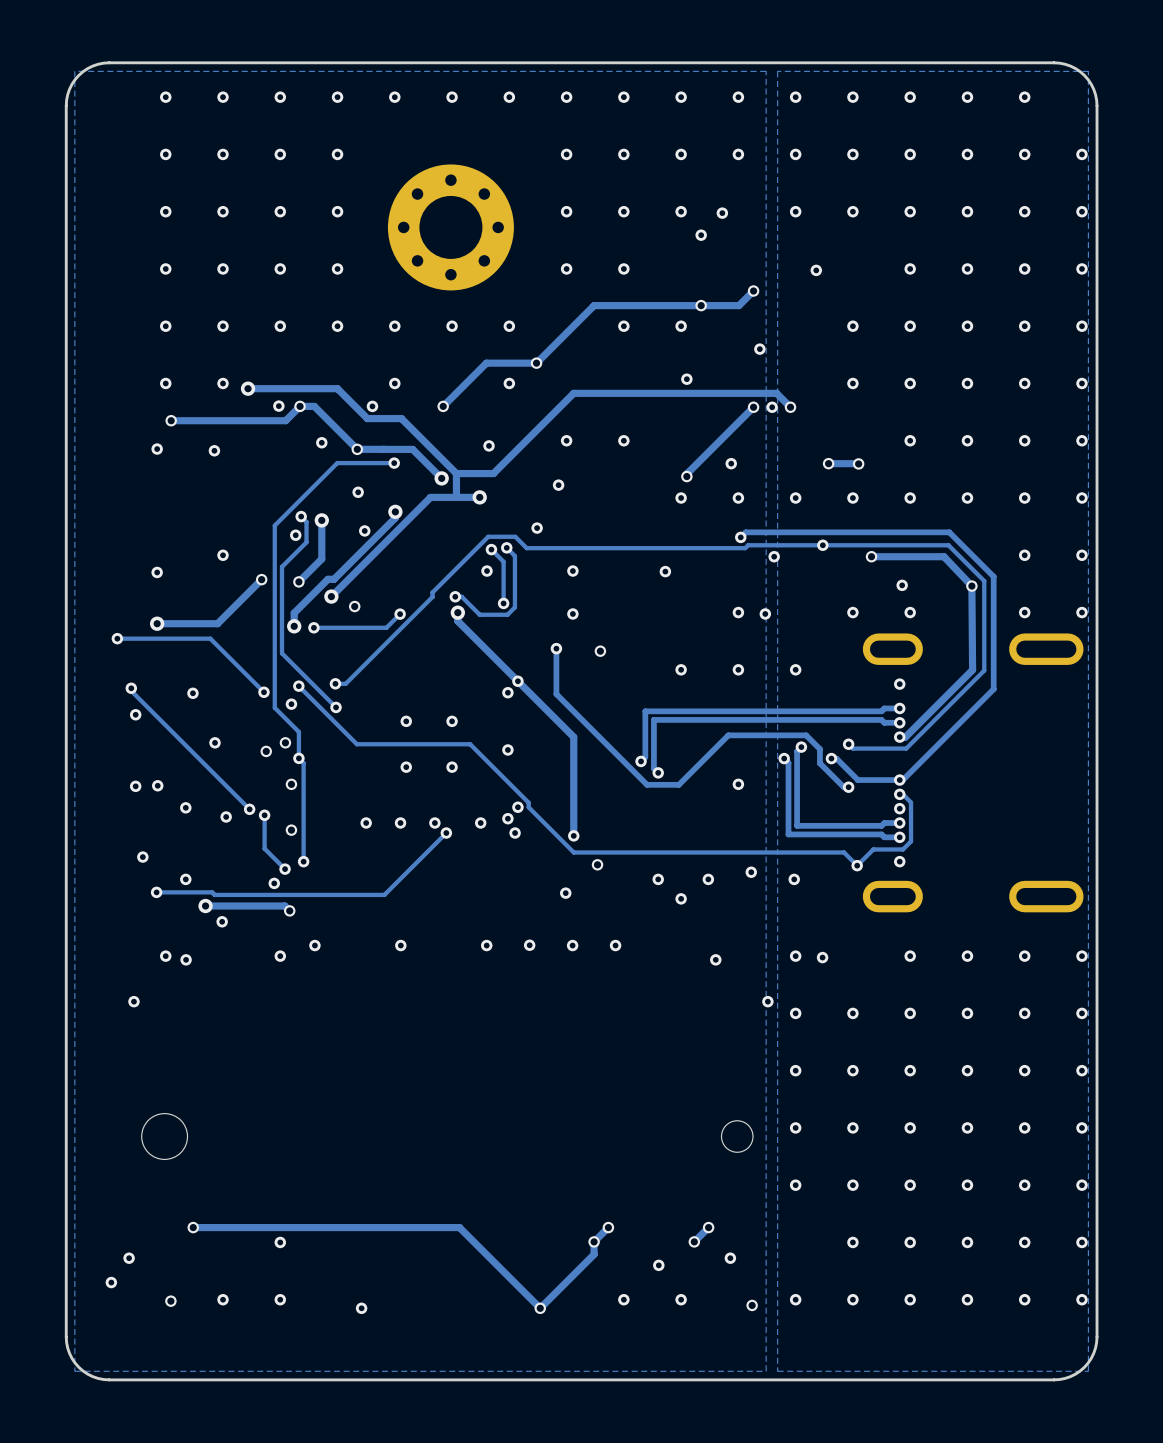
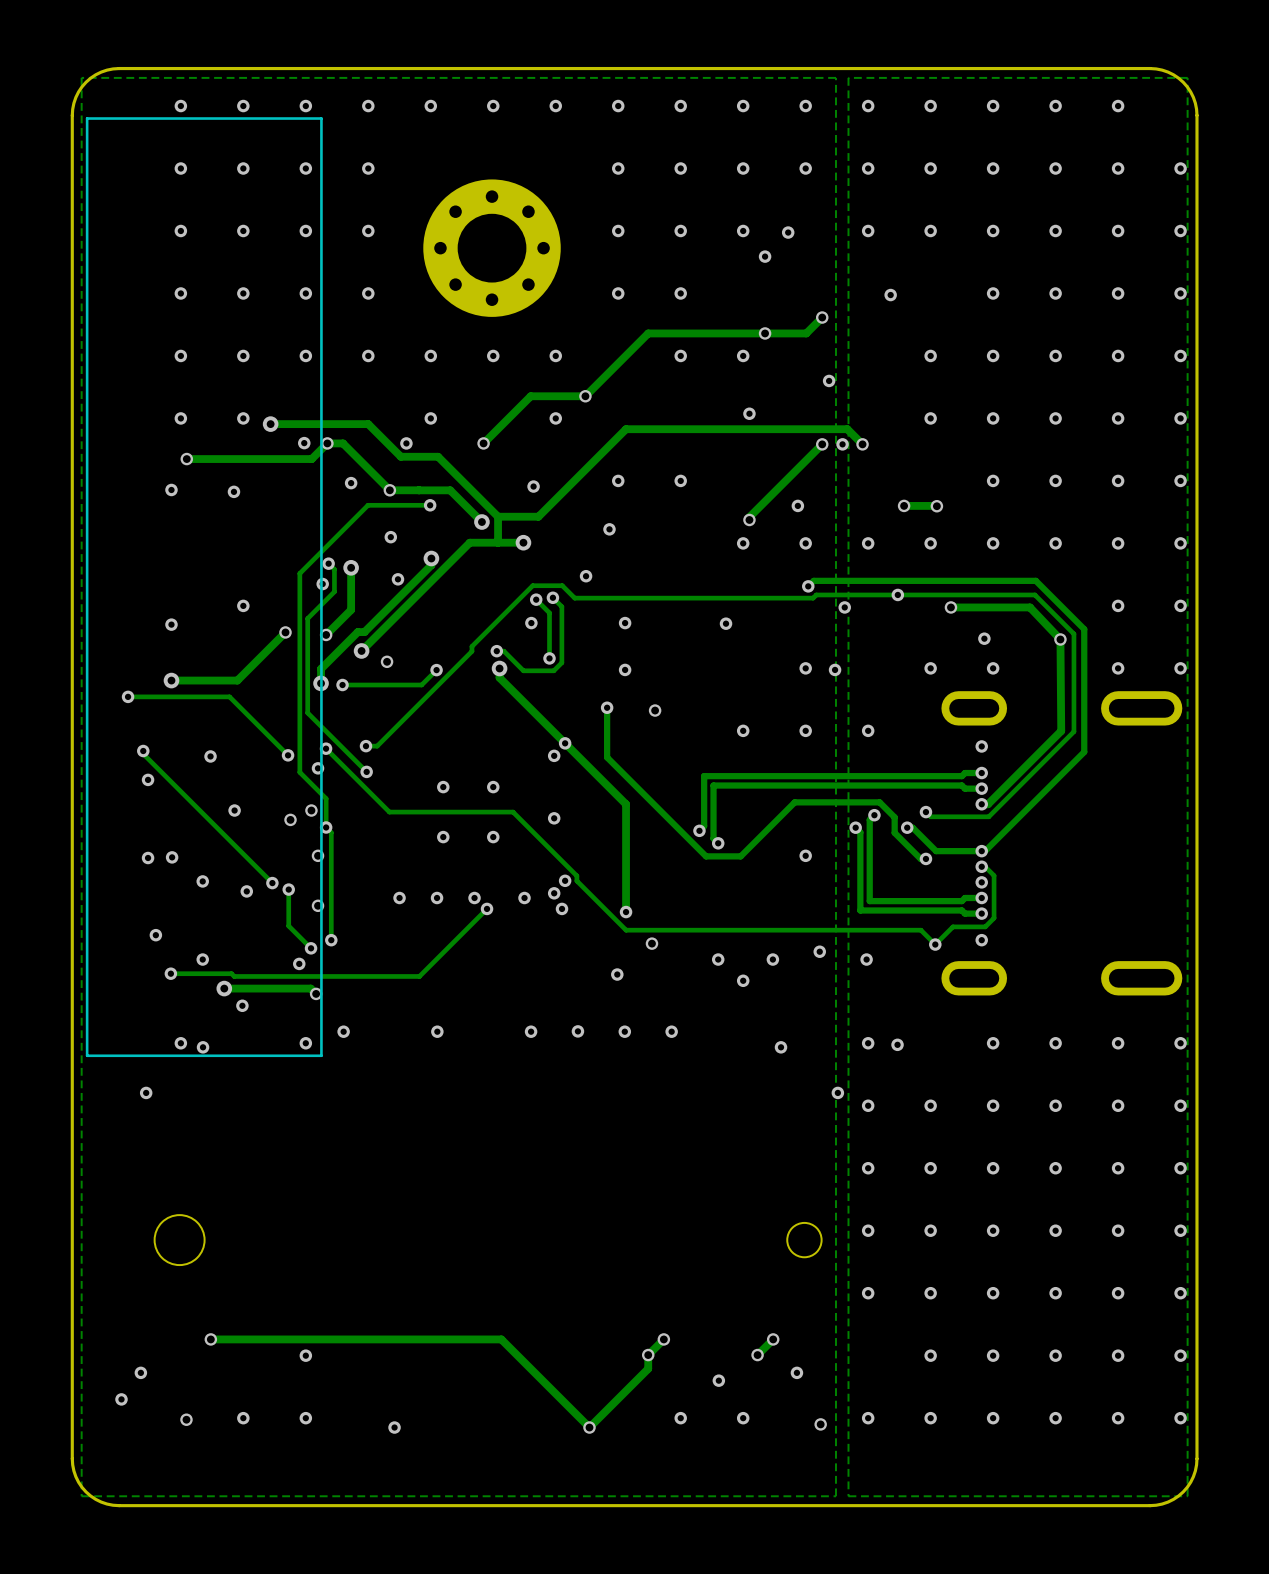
line: none -> (321, 118) (321, 1055) (87, 1055) (87, 118) (321, 118)

